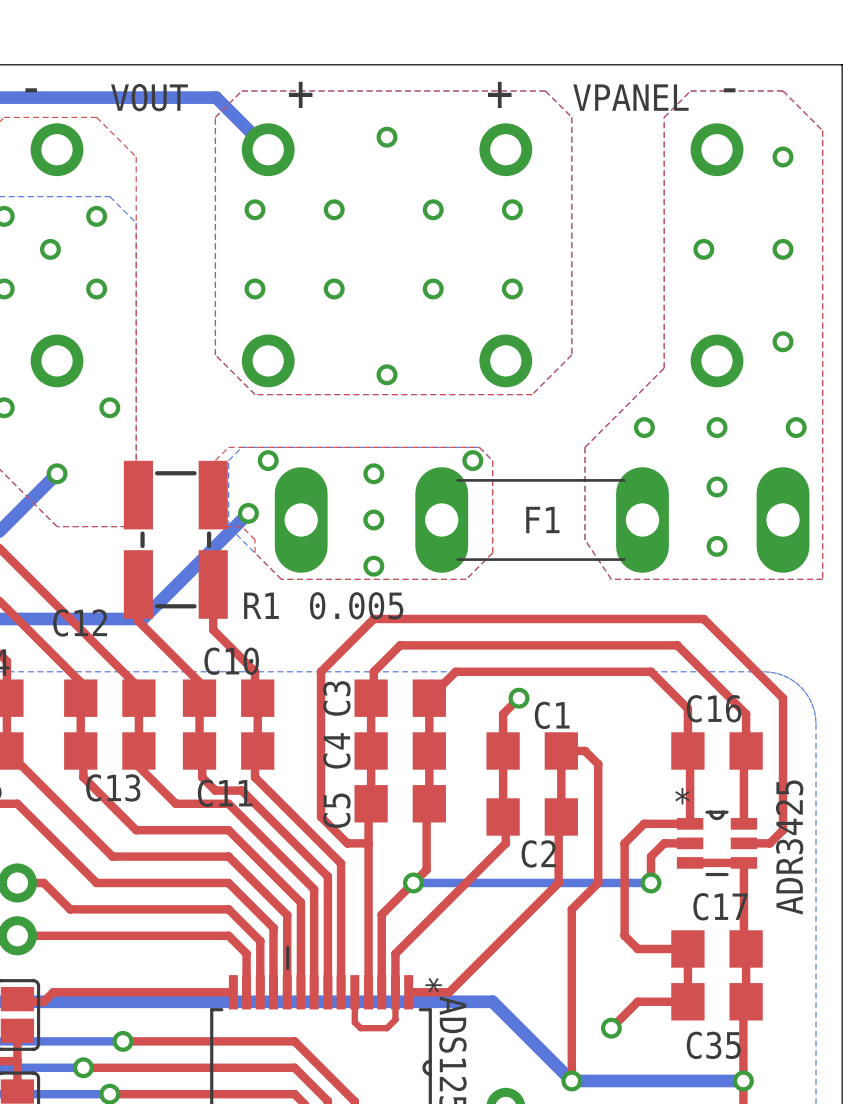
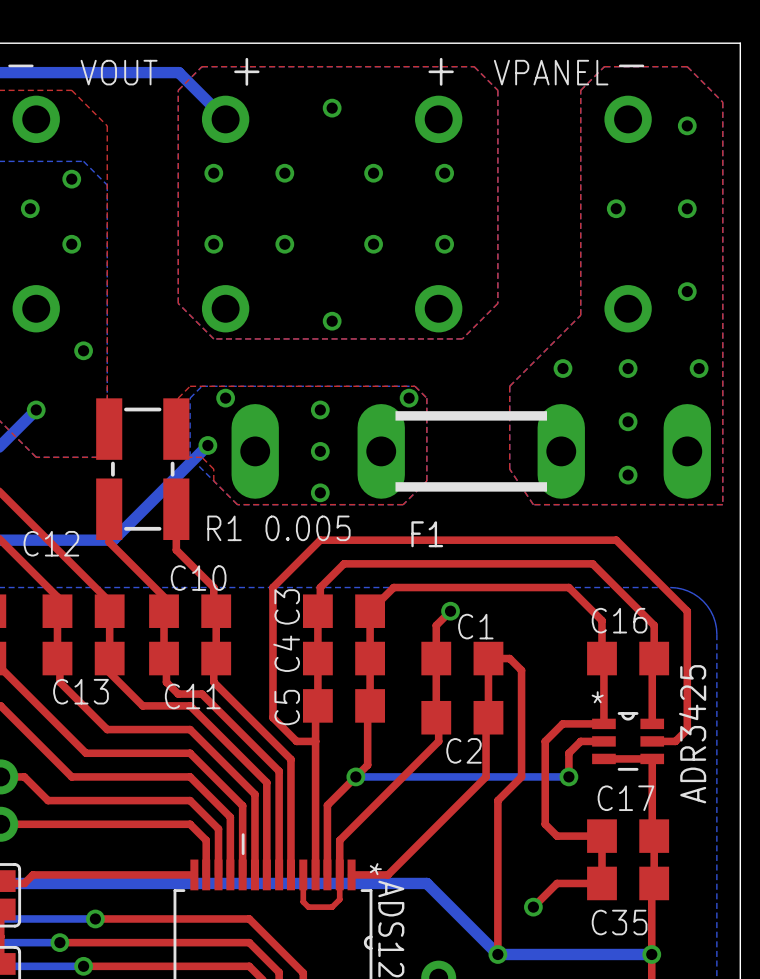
F1 footprint: [274, 467, 810, 573] -> [231, 404, 711, 499]
F1 name position: F1 (542, 519) -> F1 (427, 534)

